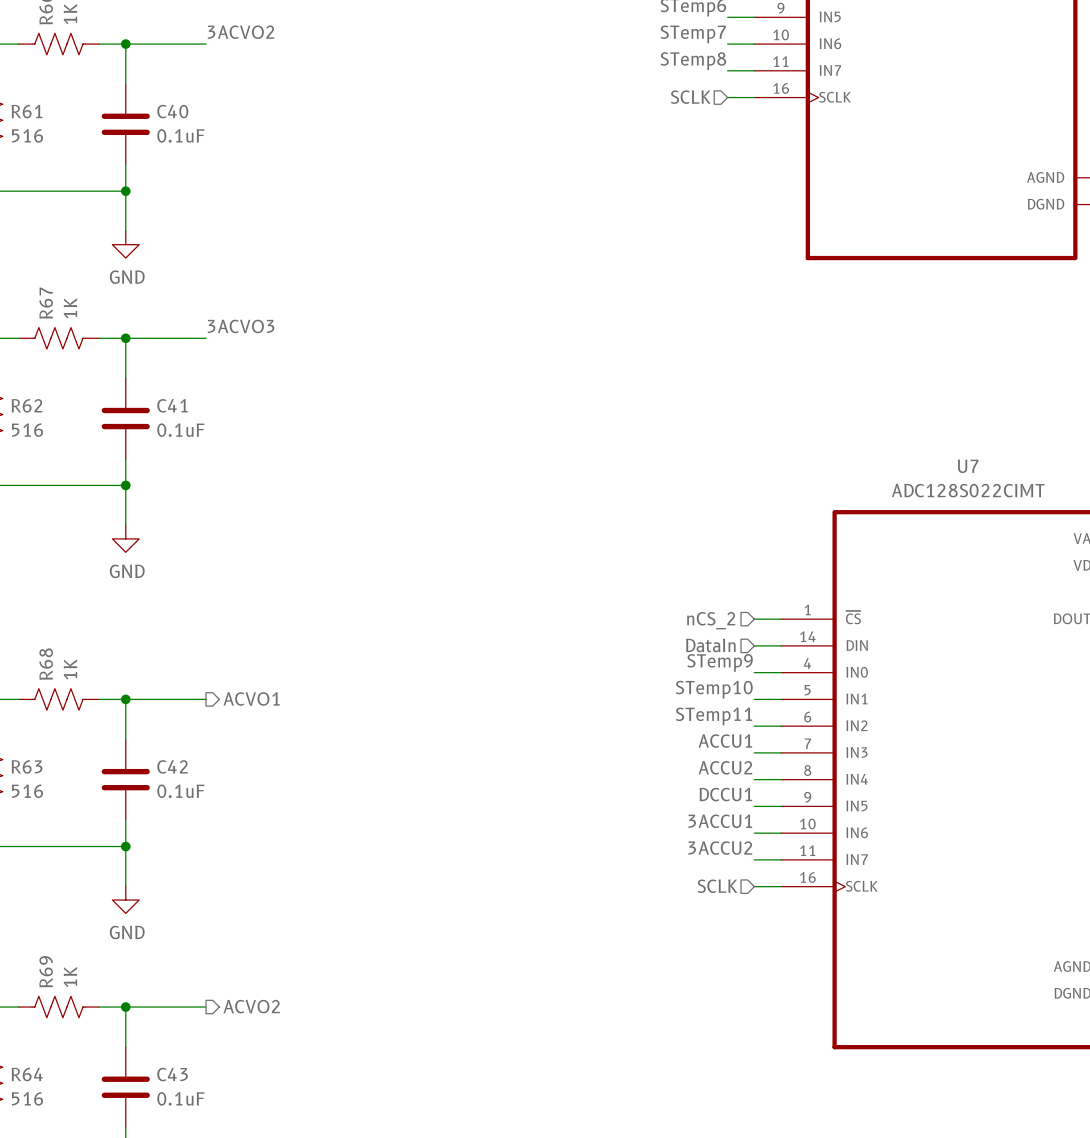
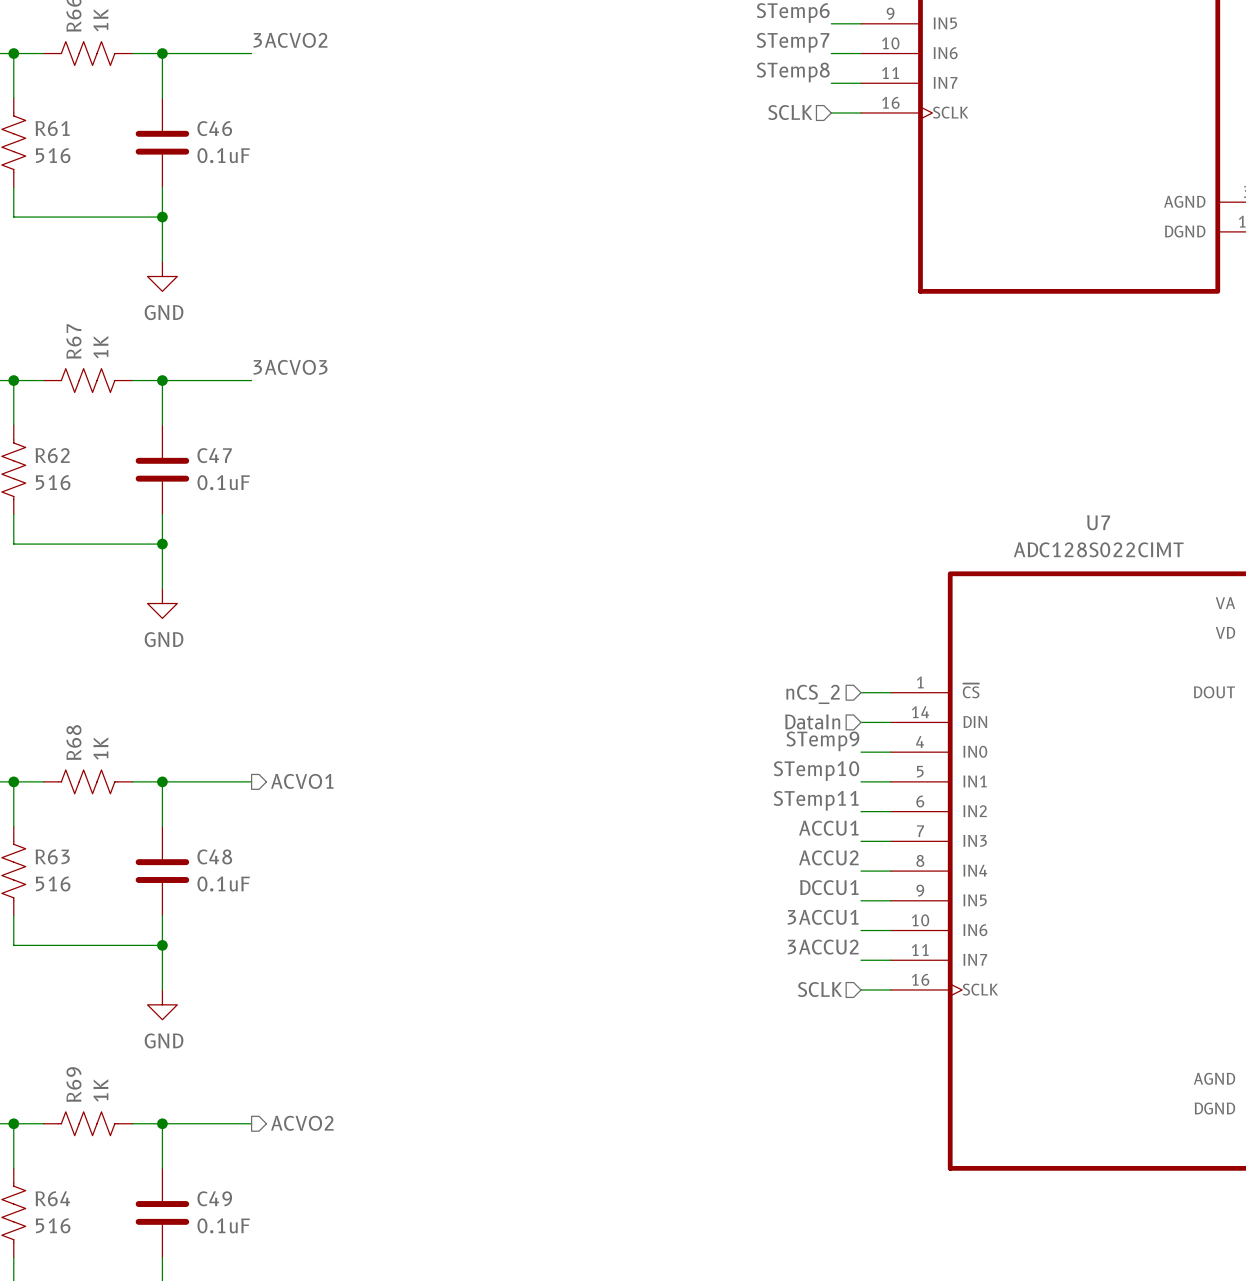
C40 name: C40 (172, 111) -> C46 (214, 128)
C41 name: C41 (172, 405) -> C47 (214, 455)
C42 name: C42 (172, 766) -> C48 (214, 856)
C43 name: C43 (172, 1074) -> C49 (214, 1198)

